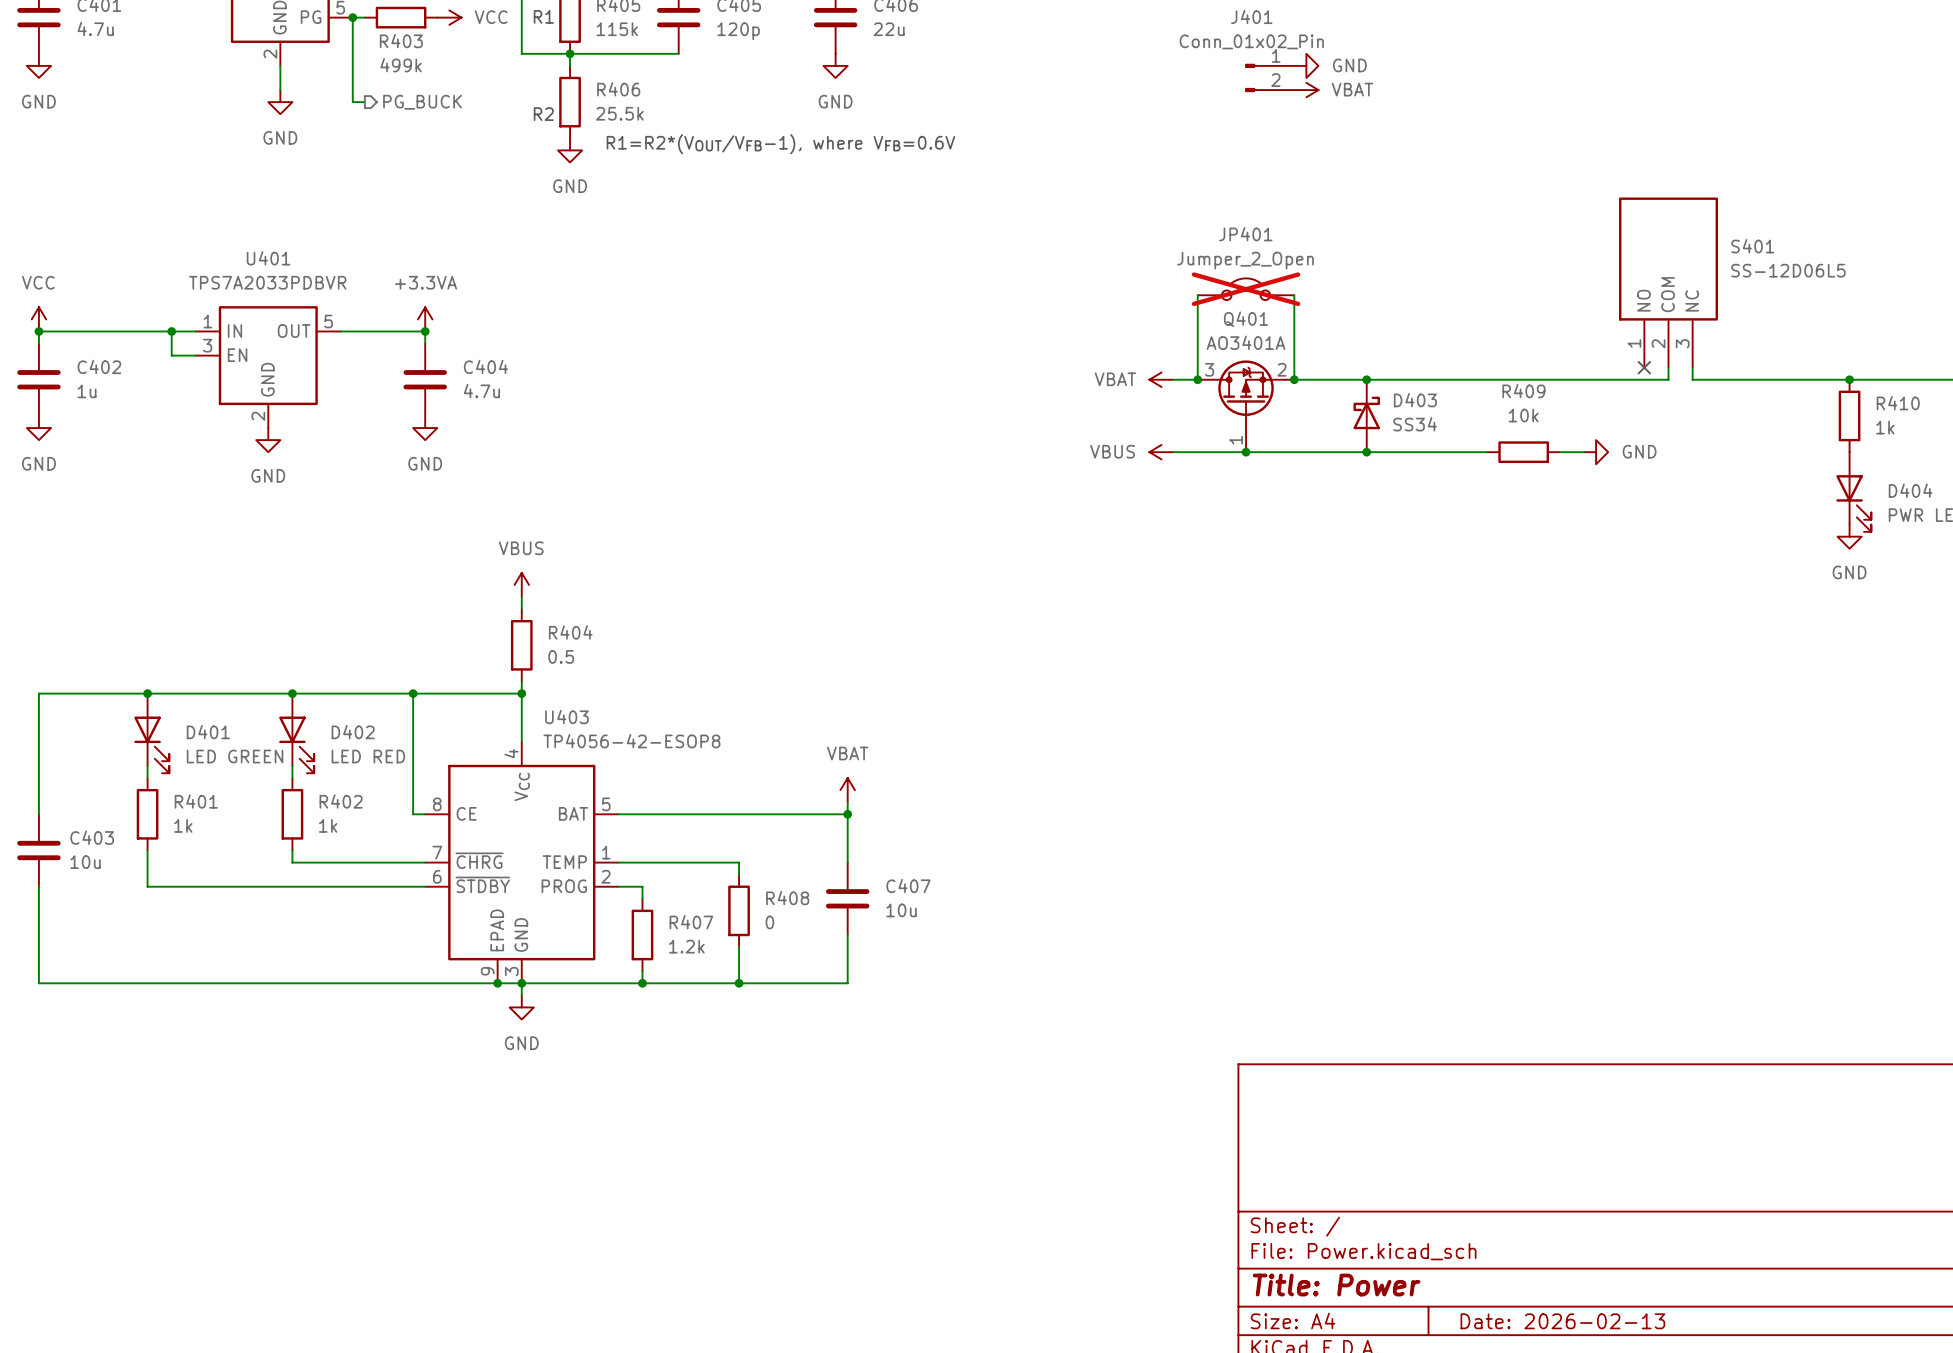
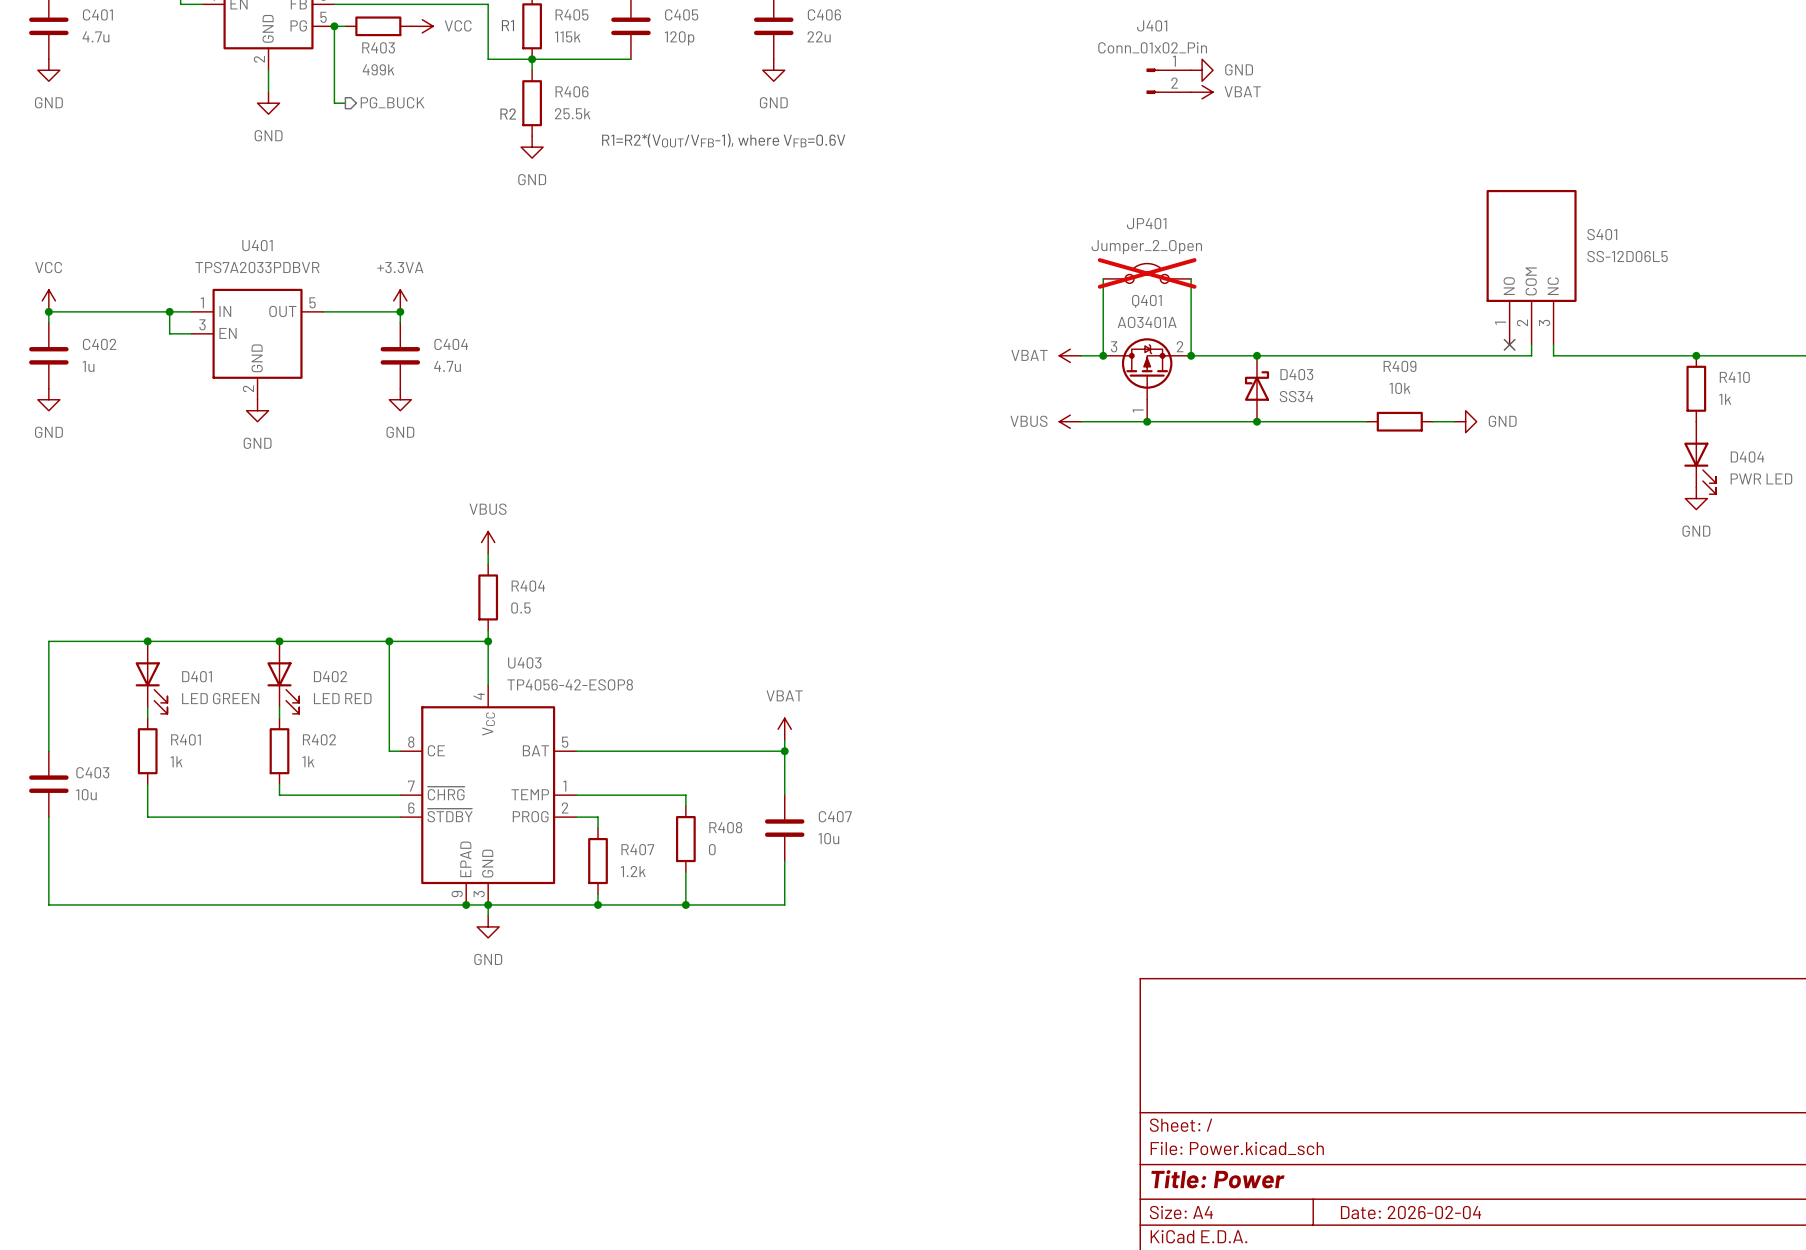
title block: Date: 2026-02-13 (1562, 1321) -> Date: 2026-02-04 (1411, 1212)

